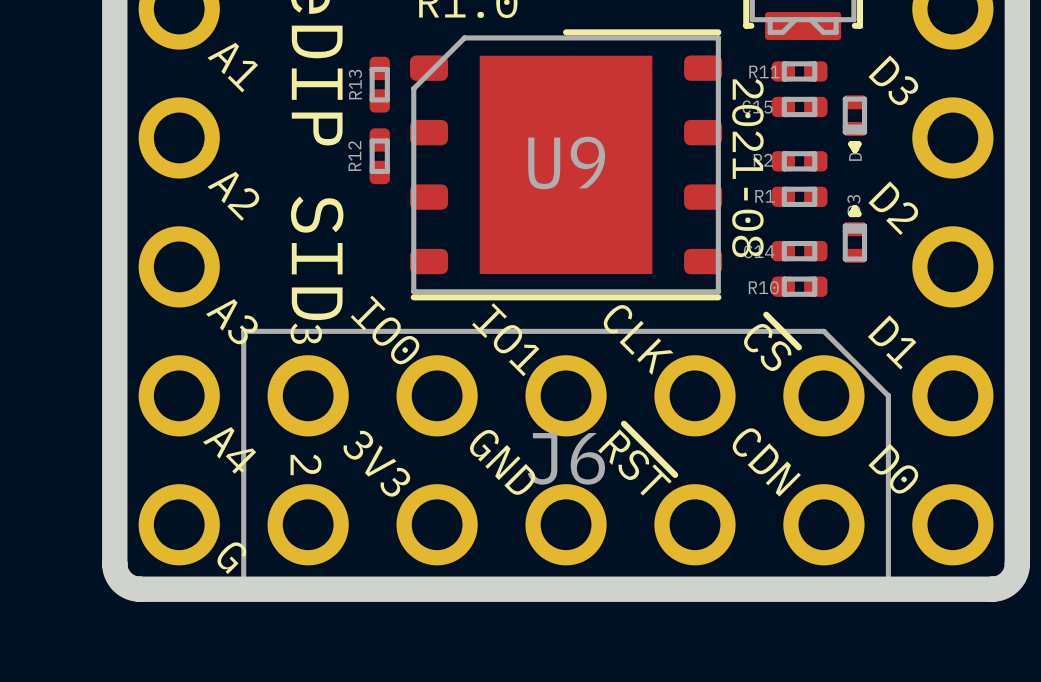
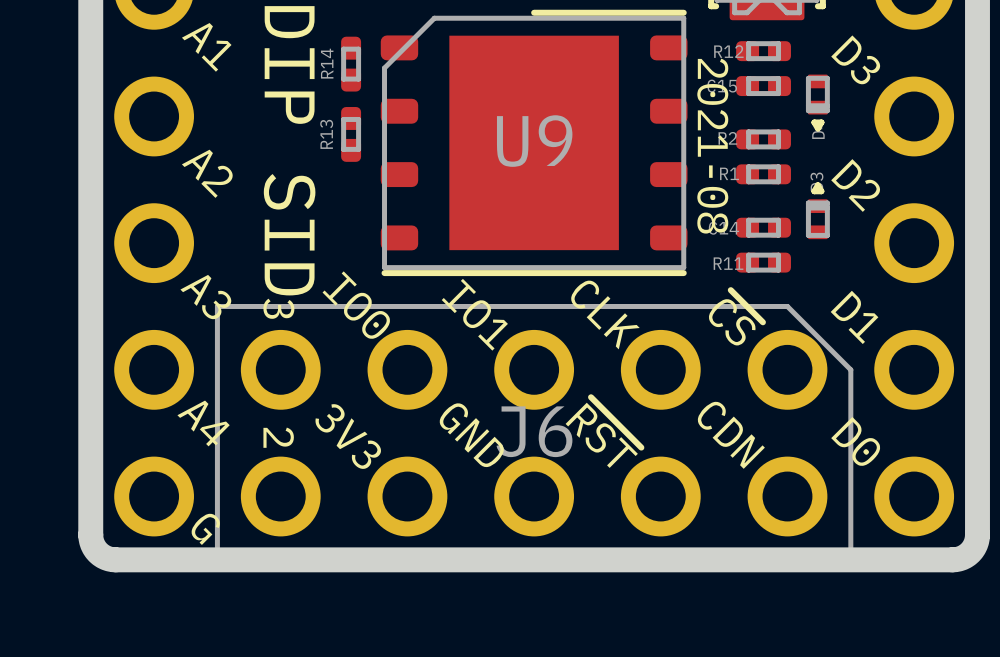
R11 name: R11 (764, 71) -> R12 (728, 51)
R13 name: R13 (355, 84) -> R14 (327, 63)
R12 name: R12 (354, 155) -> R13 (326, 134)
R10 name: R10 (763, 287) -> R11 (728, 263)

